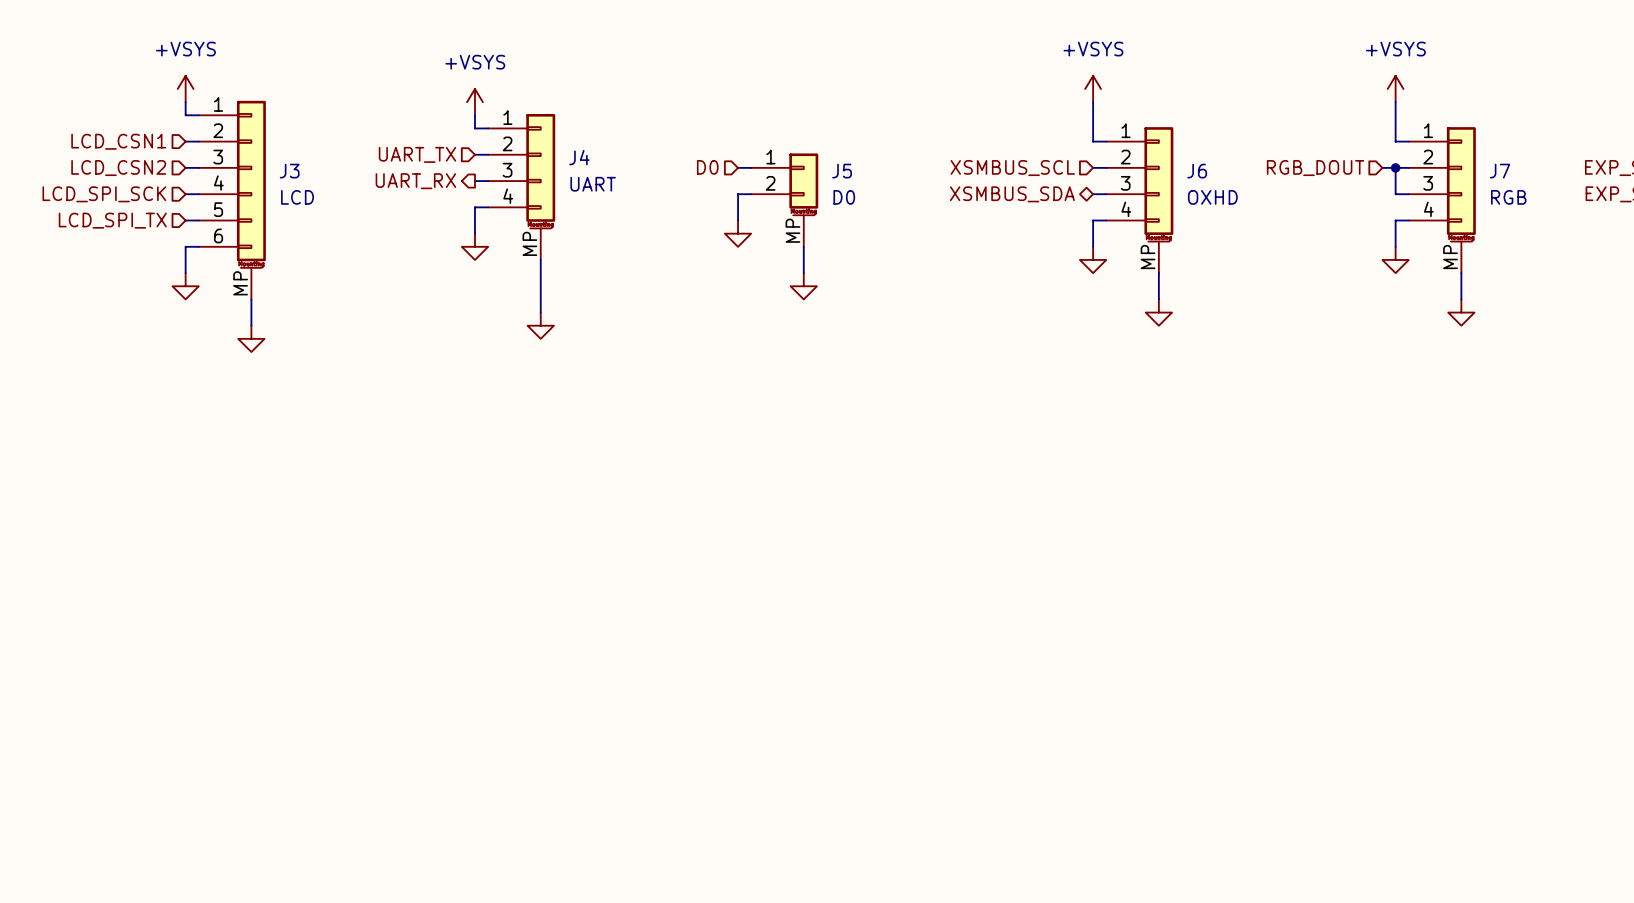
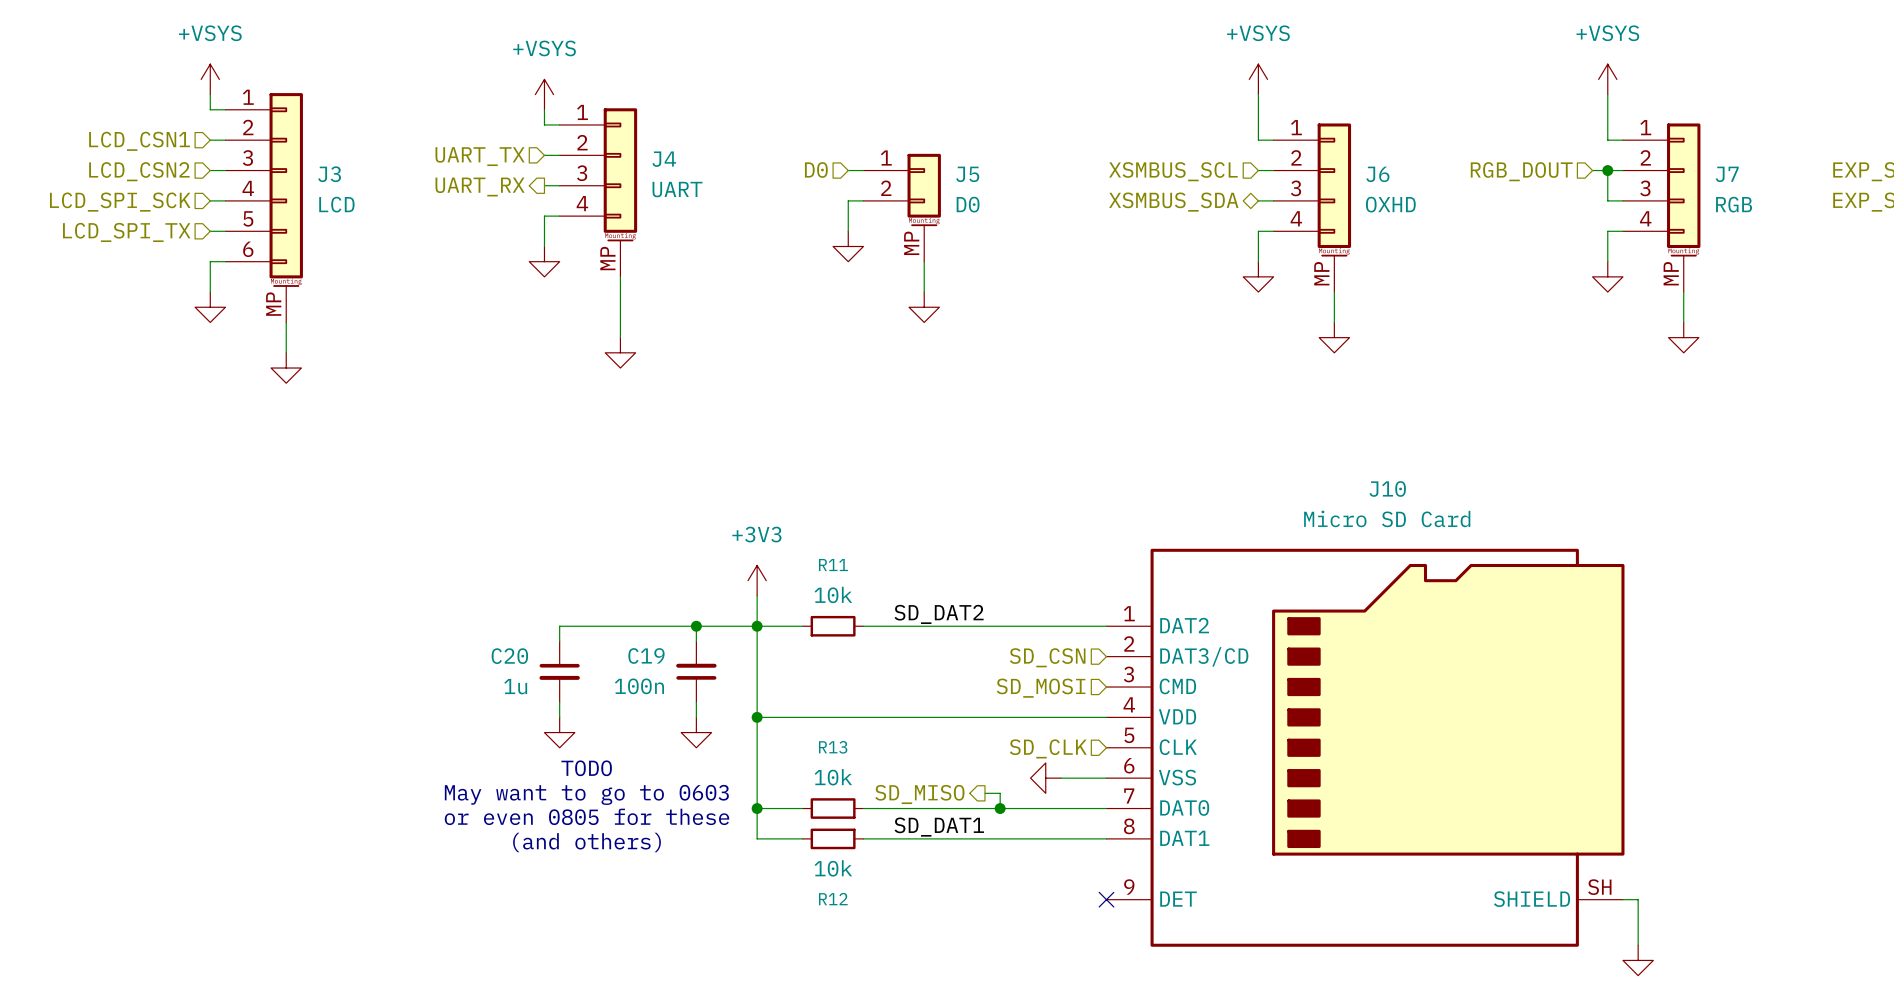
power symbol: none -> +3V3 (757, 580)
wire: none -> (757, 595) (757, 838) (802, 838)
label: none -> SD_DAT2 (939, 614)
wire: none -> (696, 626) (696, 641)
junction: none -> (696, 626)
junction: none -> (757, 626)
wire: none -> (802, 626) (559, 626) (559, 641)
R11: none -> 10k (833, 626)
wire: none -> (863, 626) (1106, 626)
hierarchical label: none -> SD_CSN (1047, 657)
C20: none -> 1u (559, 671)
C19: none -> 100n (696, 671)
hierarchical label: none -> SD_MOSI (1041, 688)
wire: none -> (559, 702) (559, 717)
wire: none -> (696, 702) (696, 717)
wire: none -> (757, 717) (1106, 717)
junction: none -> (757, 717)
power symbol: none -> (559, 732)
power symbol: none -> (696, 732)
hierarchical label: none -> SD_CLK (1048, 748)
J10: none -> Micro SD Card (1365, 747)
text: none -> TODO (586, 768)
power symbol: none -> (1045, 778)
wire: none -> (1060, 778) (1106, 778)
hierarchical label: none -> SD_MISO (919, 794)
wire: none -> (984, 793) (1000, 793) (1000, 808)
text: none -> May want to go to 0603 (586, 794)
wire: none -> (757, 808) (802, 808)
junction: none -> (757, 808)
R13: none -> 10k (833, 808)
wire: none -> (863, 808) (1106, 808)
junction: none -> (1000, 808)
text: none -> or even 0805 for these (586, 816)
label: none -> SD_DAT1 (939, 827)
R12: none -> 10k (833, 838)
wire: none -> (863, 838) (1106, 838)
text: none -> (and others) (587, 842)
no-connect mark: none -> (1106, 899)
wire: none -> (1622, 899) (1638, 899) (1638, 945)
power symbol: none -> (1638, 960)

